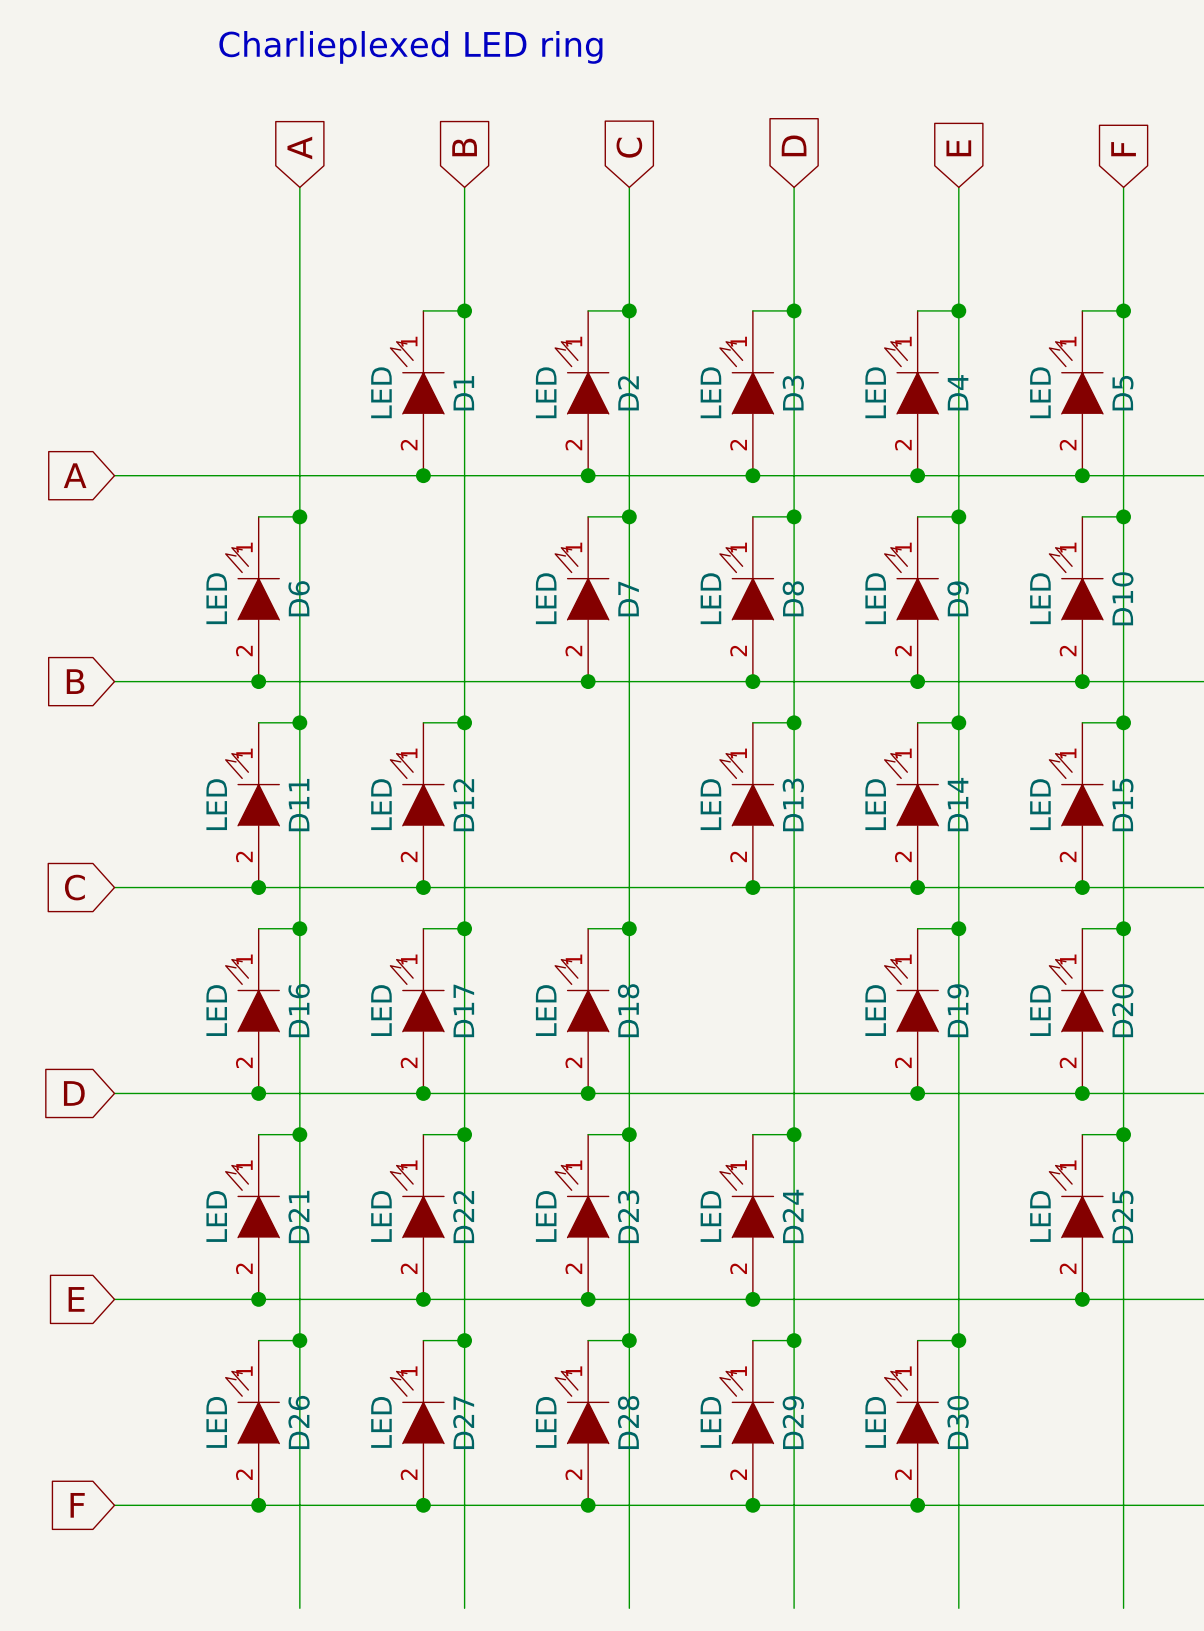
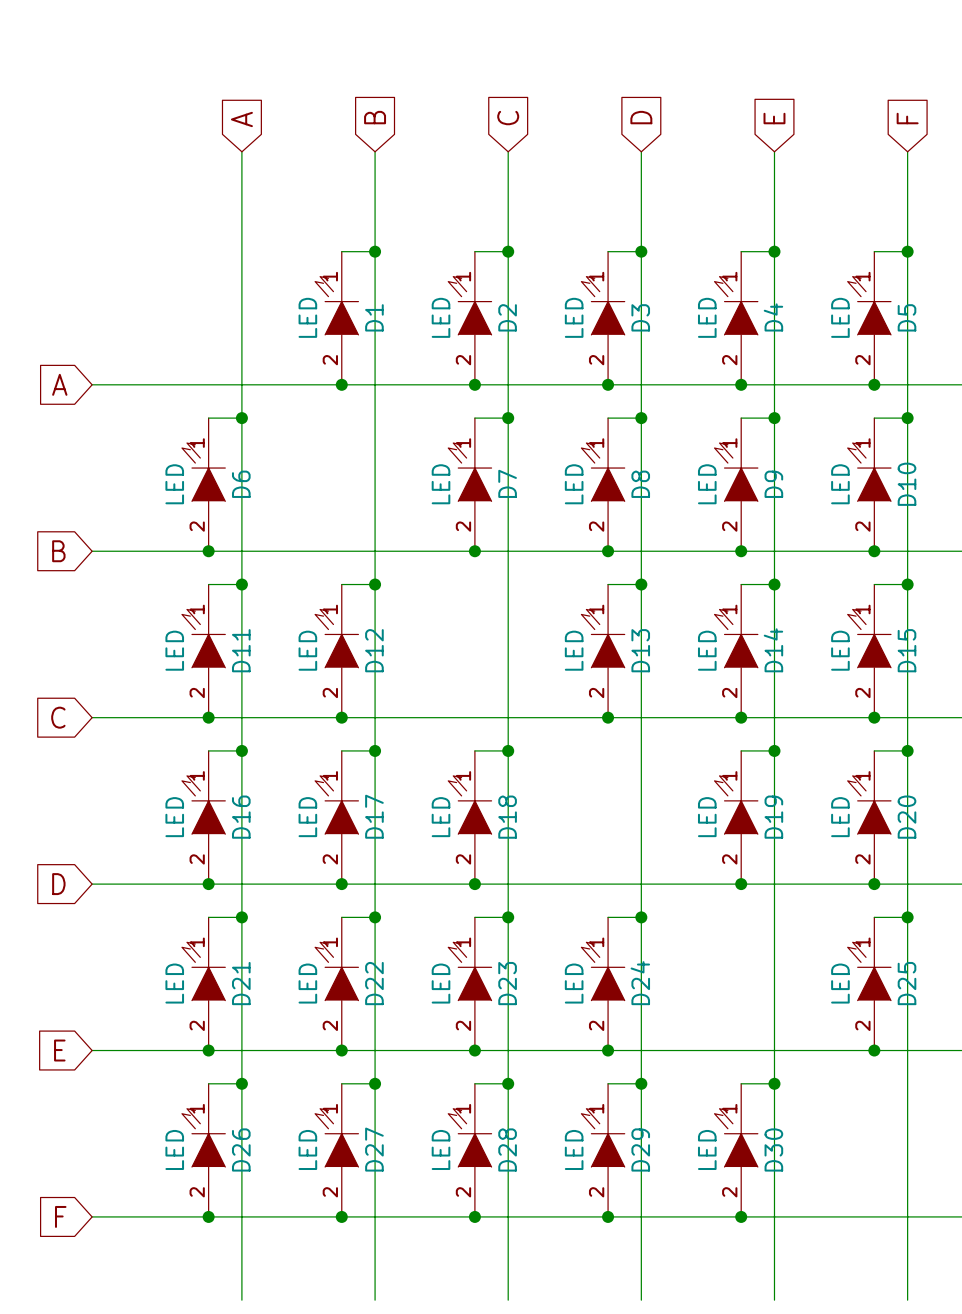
text: Charlieplexed LED ring (410, 47) -> none

